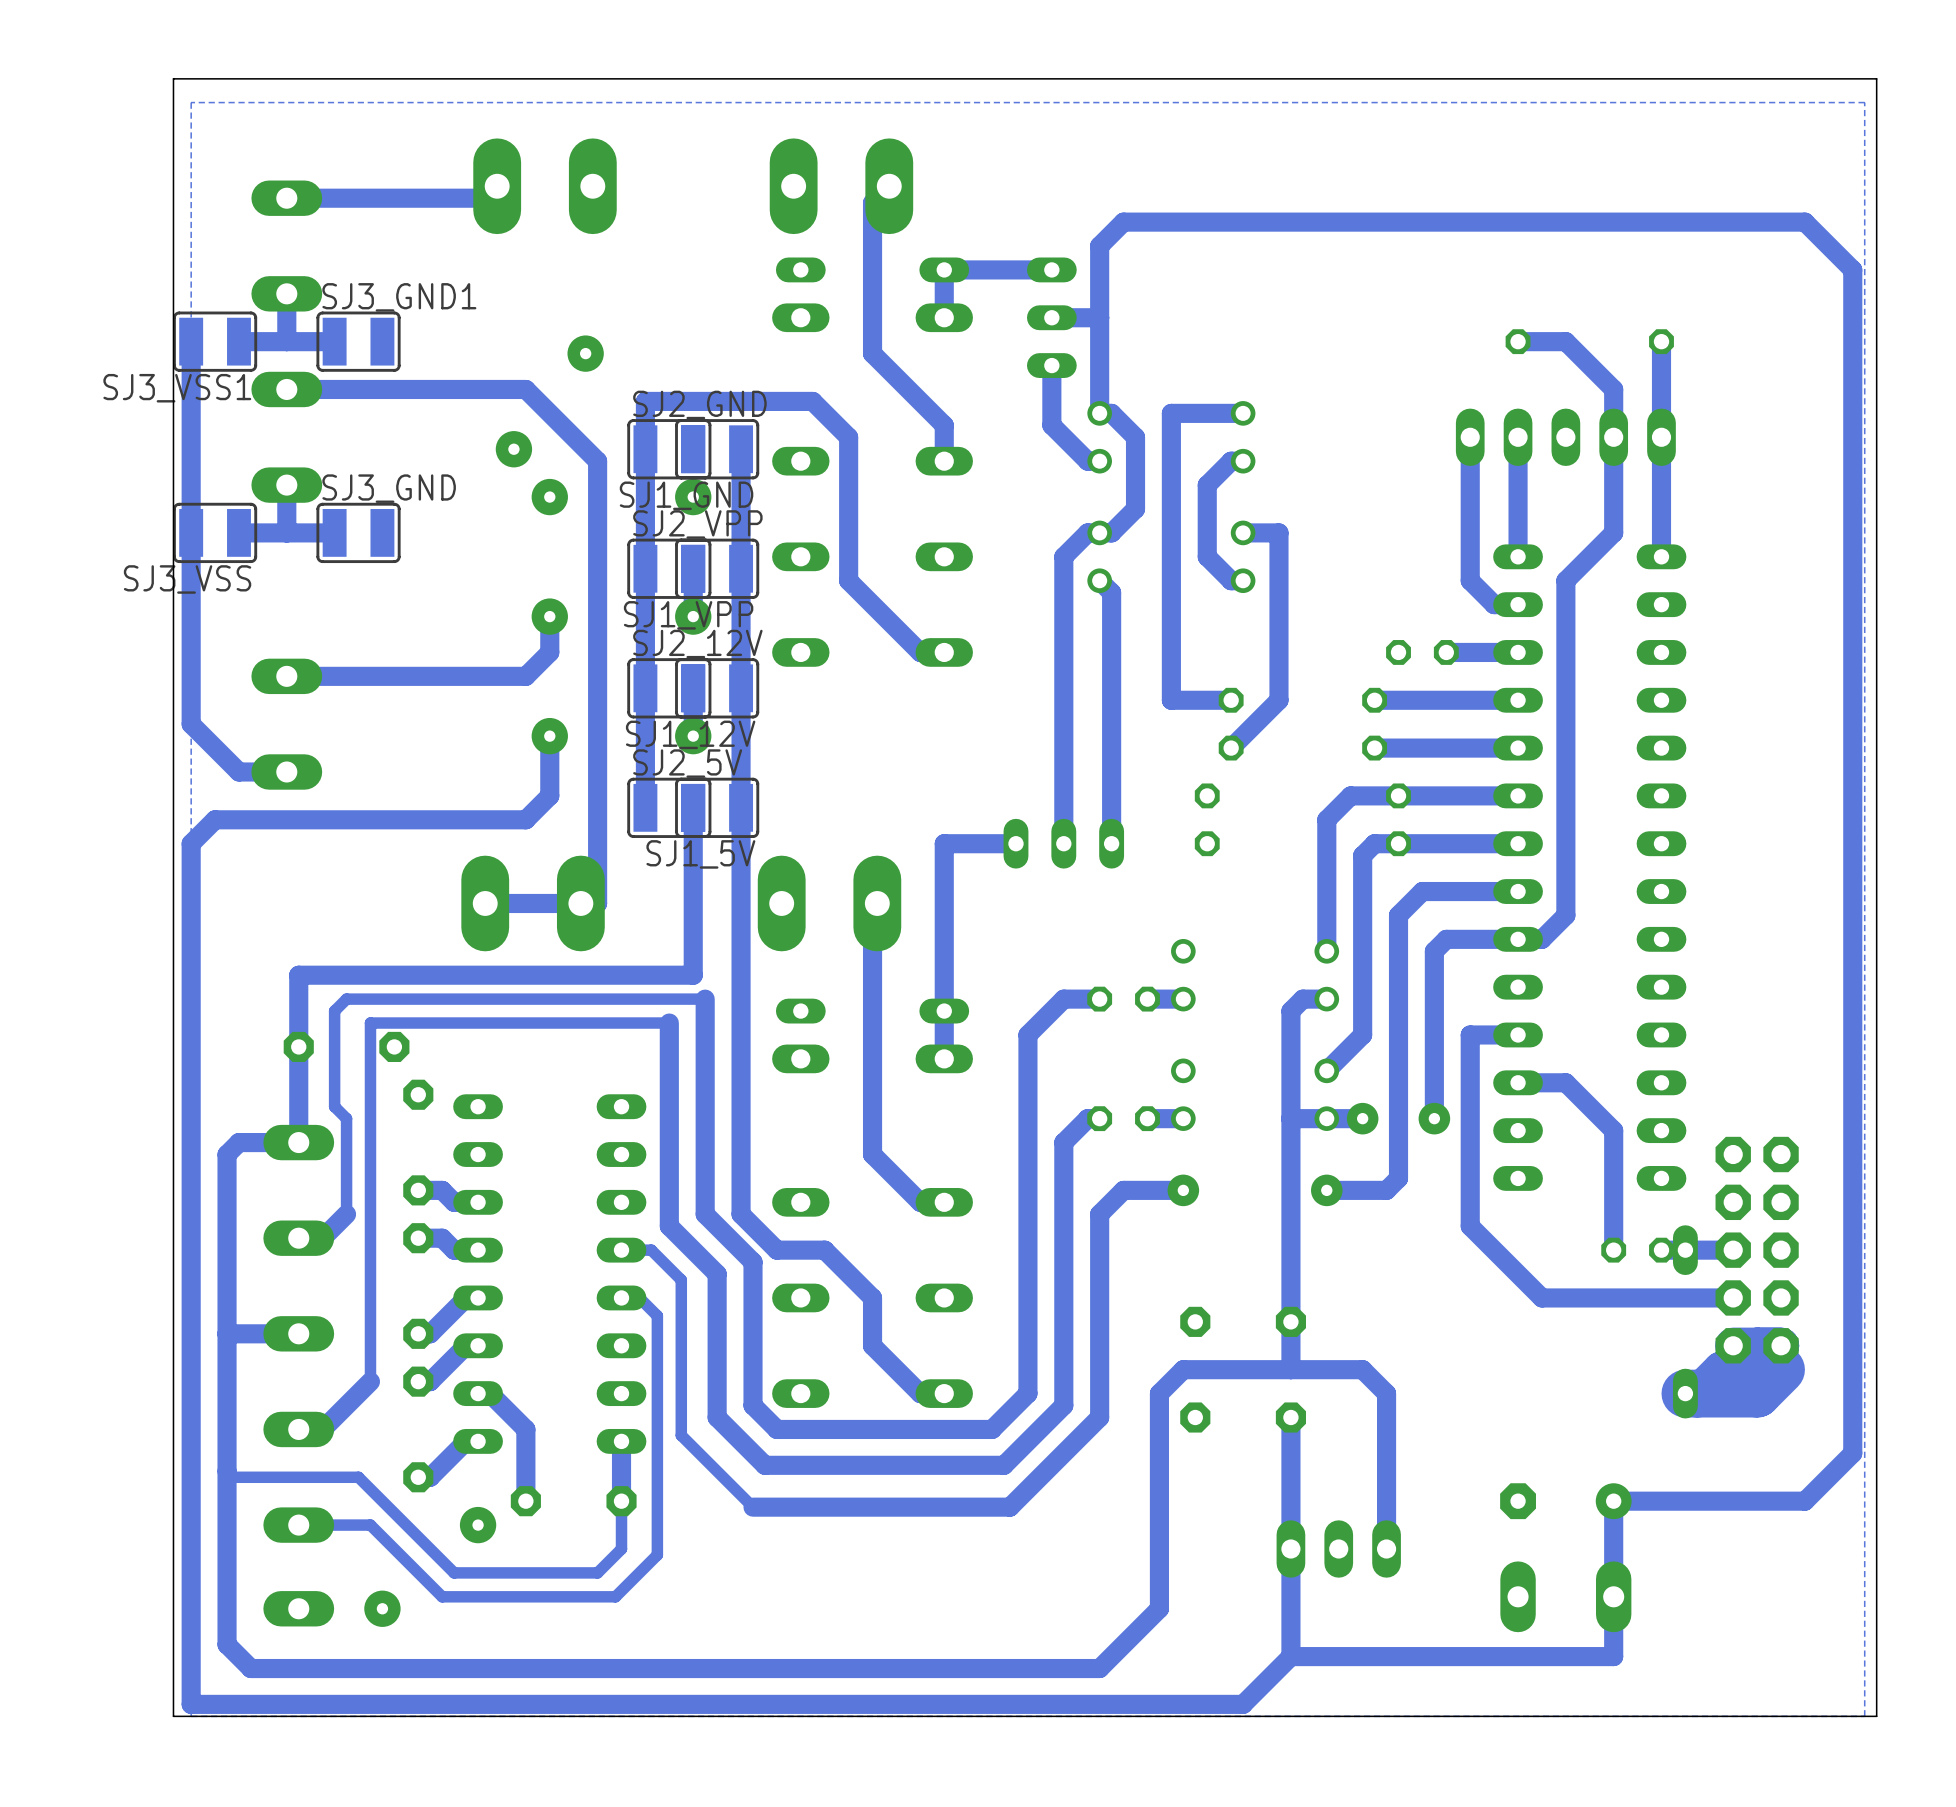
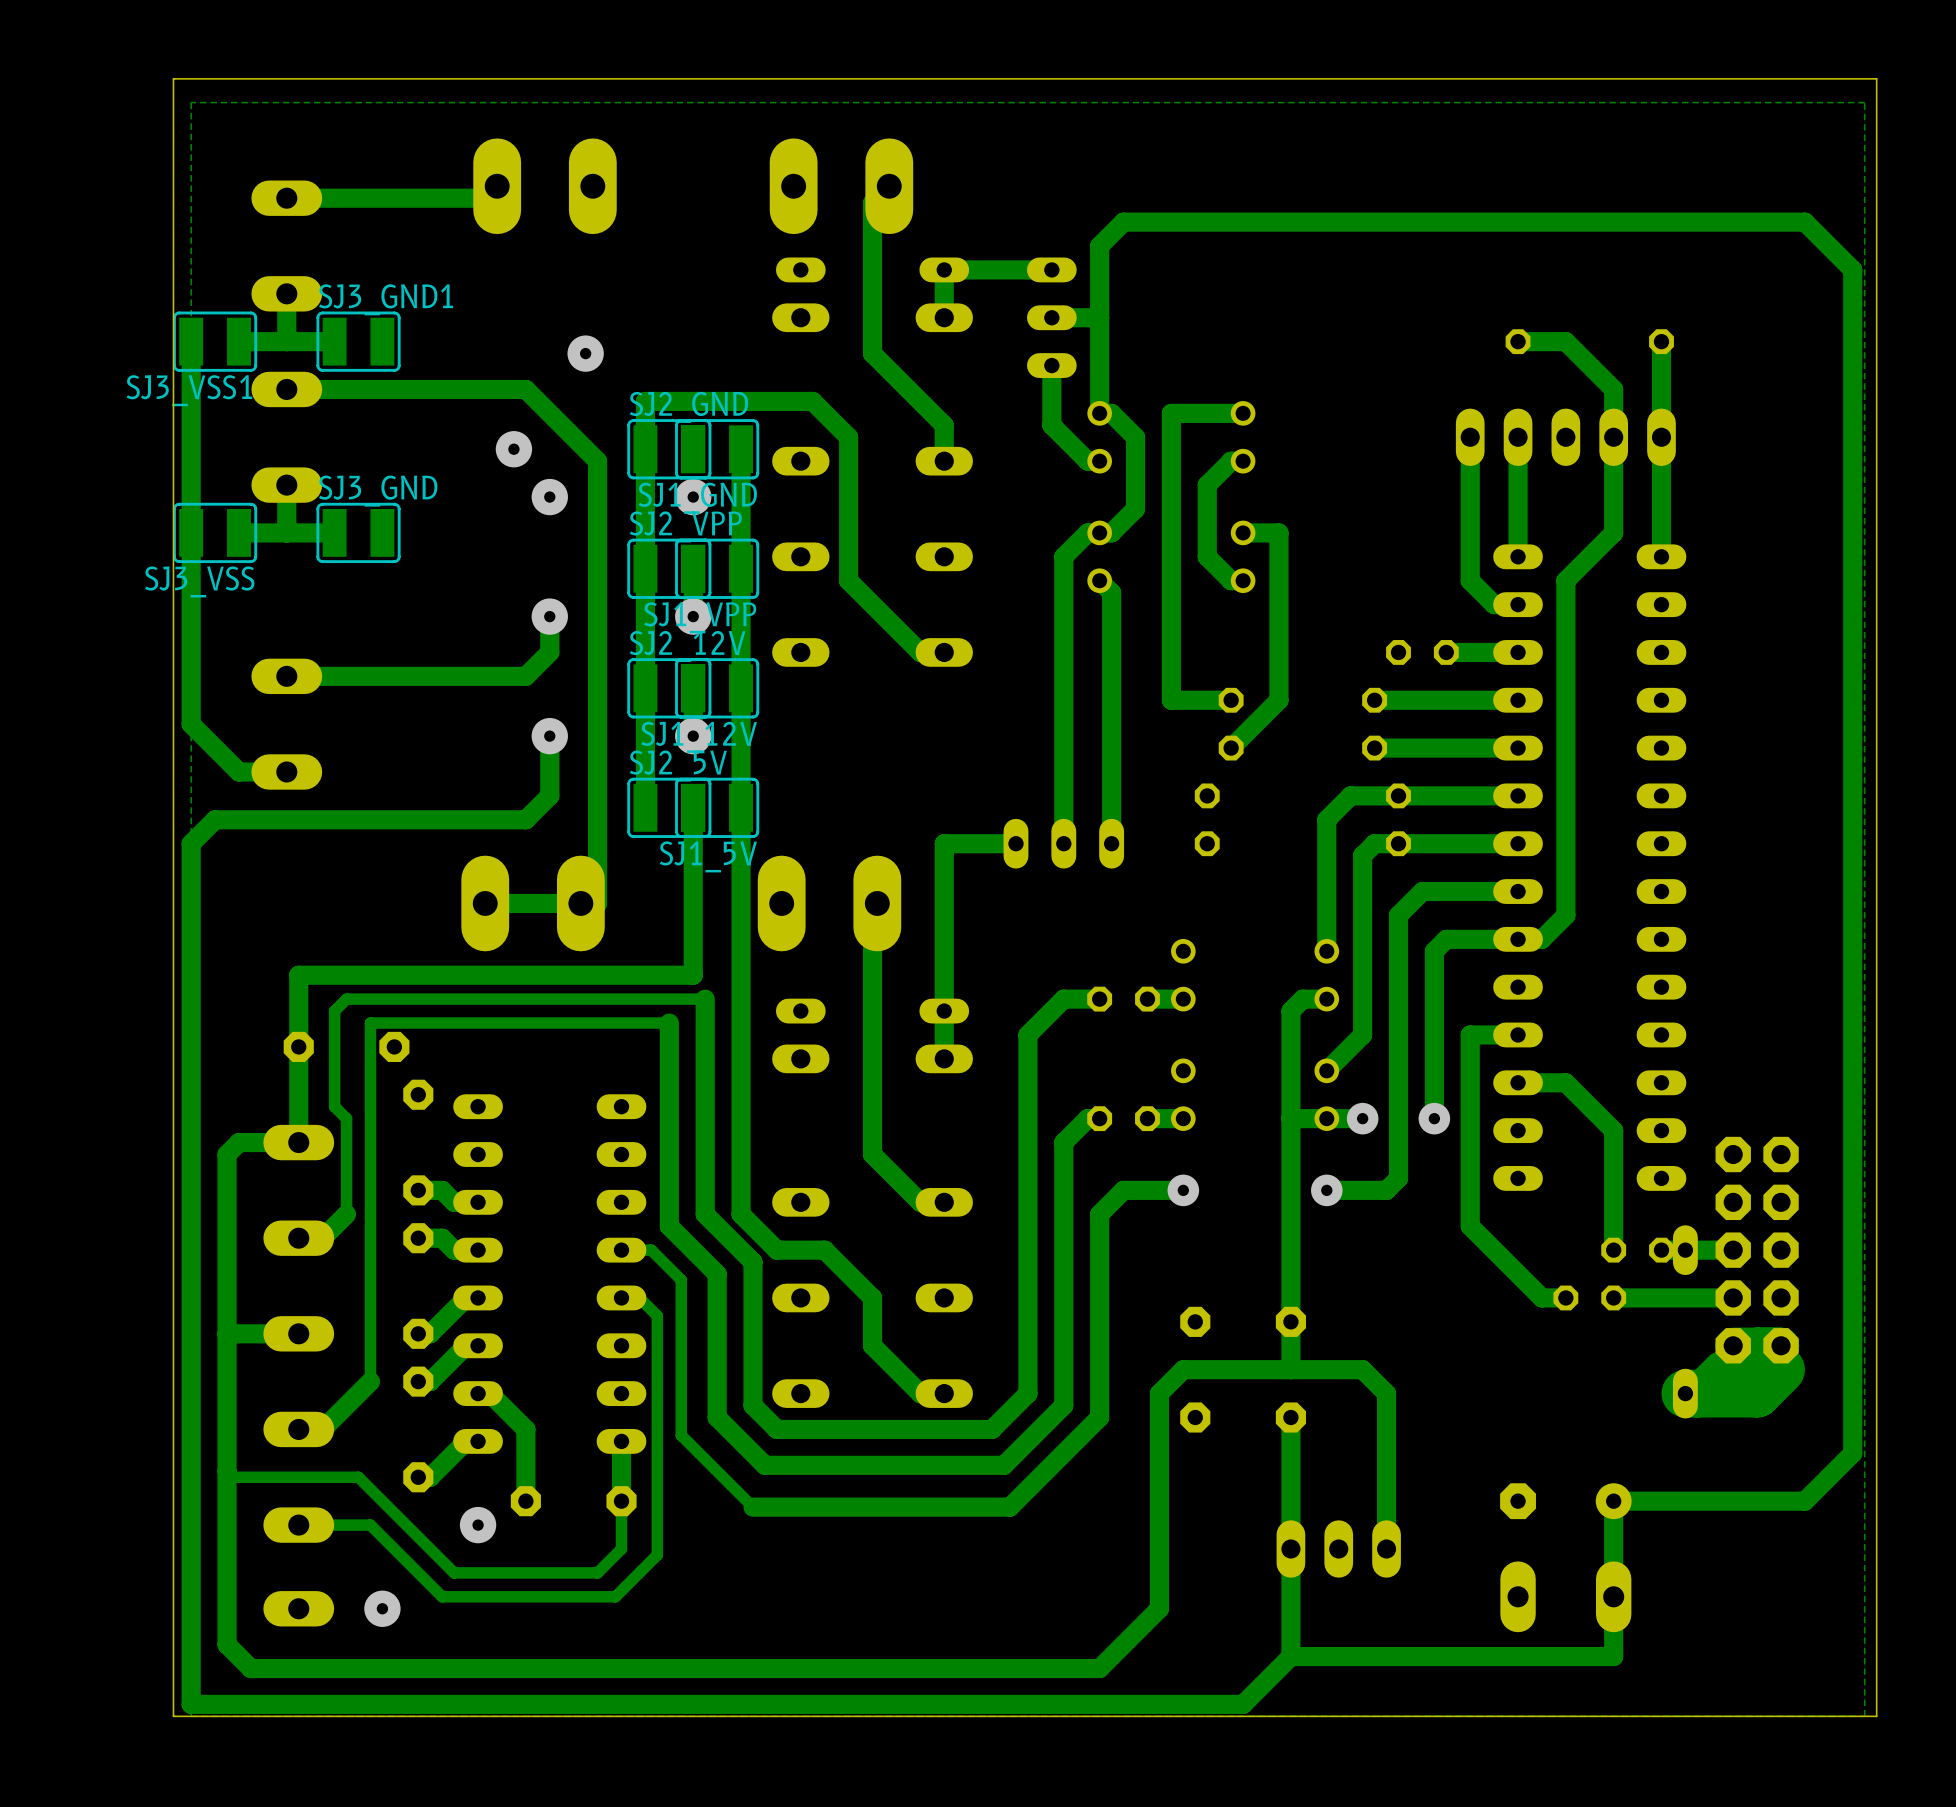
part: none -> (1589, 1297)
track: (1613, 1297) (1565, 1297) -> none

